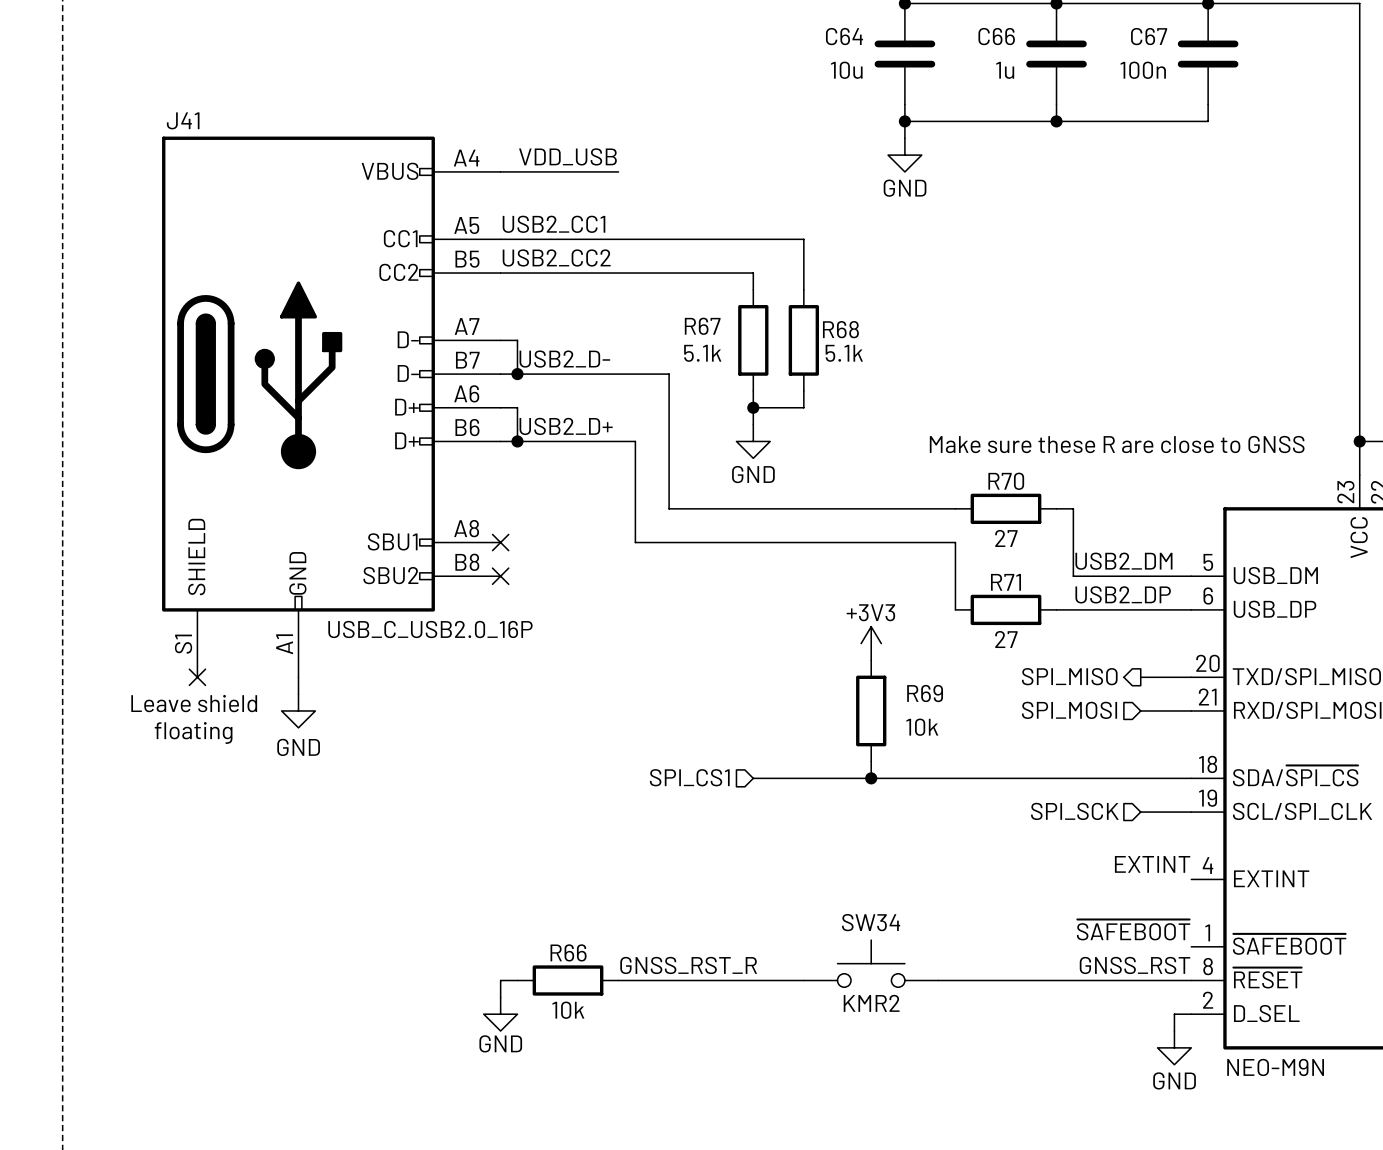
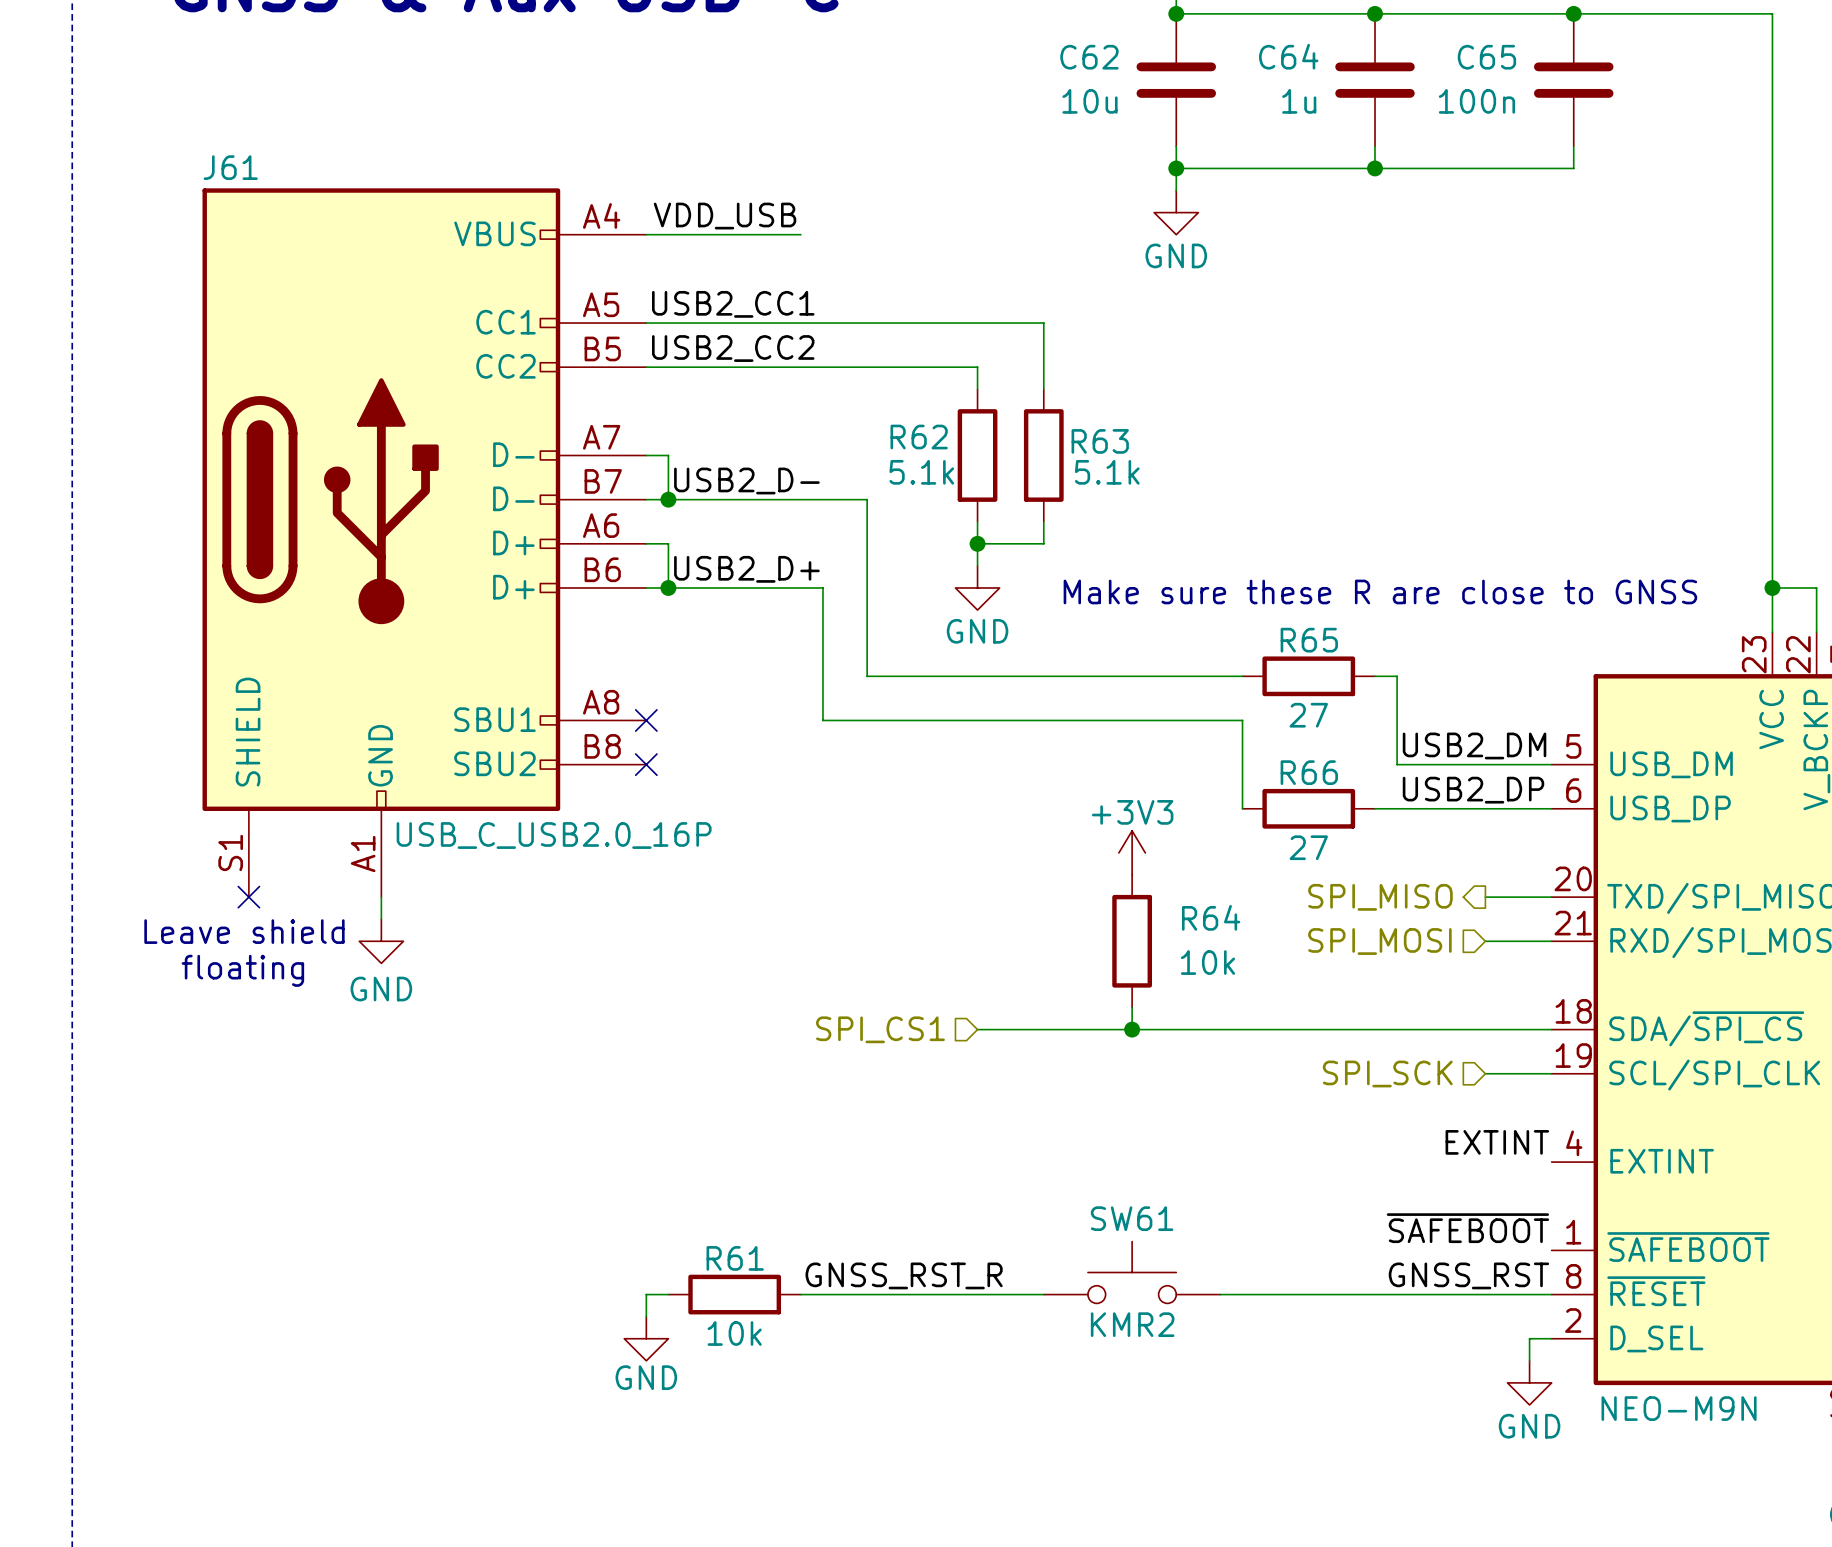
C64 name: C64 (844, 36) -> C62 (1089, 57)
C66 name: C66 (996, 36) -> C64 (1288, 56)
C67 name: C67 (1149, 36) -> C65 (1486, 57)
J41 name: J41 (183, 120) -> J61 (230, 167)
R67 name: R67 (702, 326) -> R62 (919, 437)
R68 name: R68 (840, 329) -> R63 (1100, 441)
R70 name: R70 (1006, 481) -> R65 (1309, 640)
R71 name: R71 (1005, 582) -> R66 (1309, 772)
R69 name: R69 (925, 693) -> R64 (1211, 917)
SW34 name: SW34 (871, 922) -> SW61 (1132, 1218)
R66 name: R66 (568, 952) -> R61 (735, 1258)

